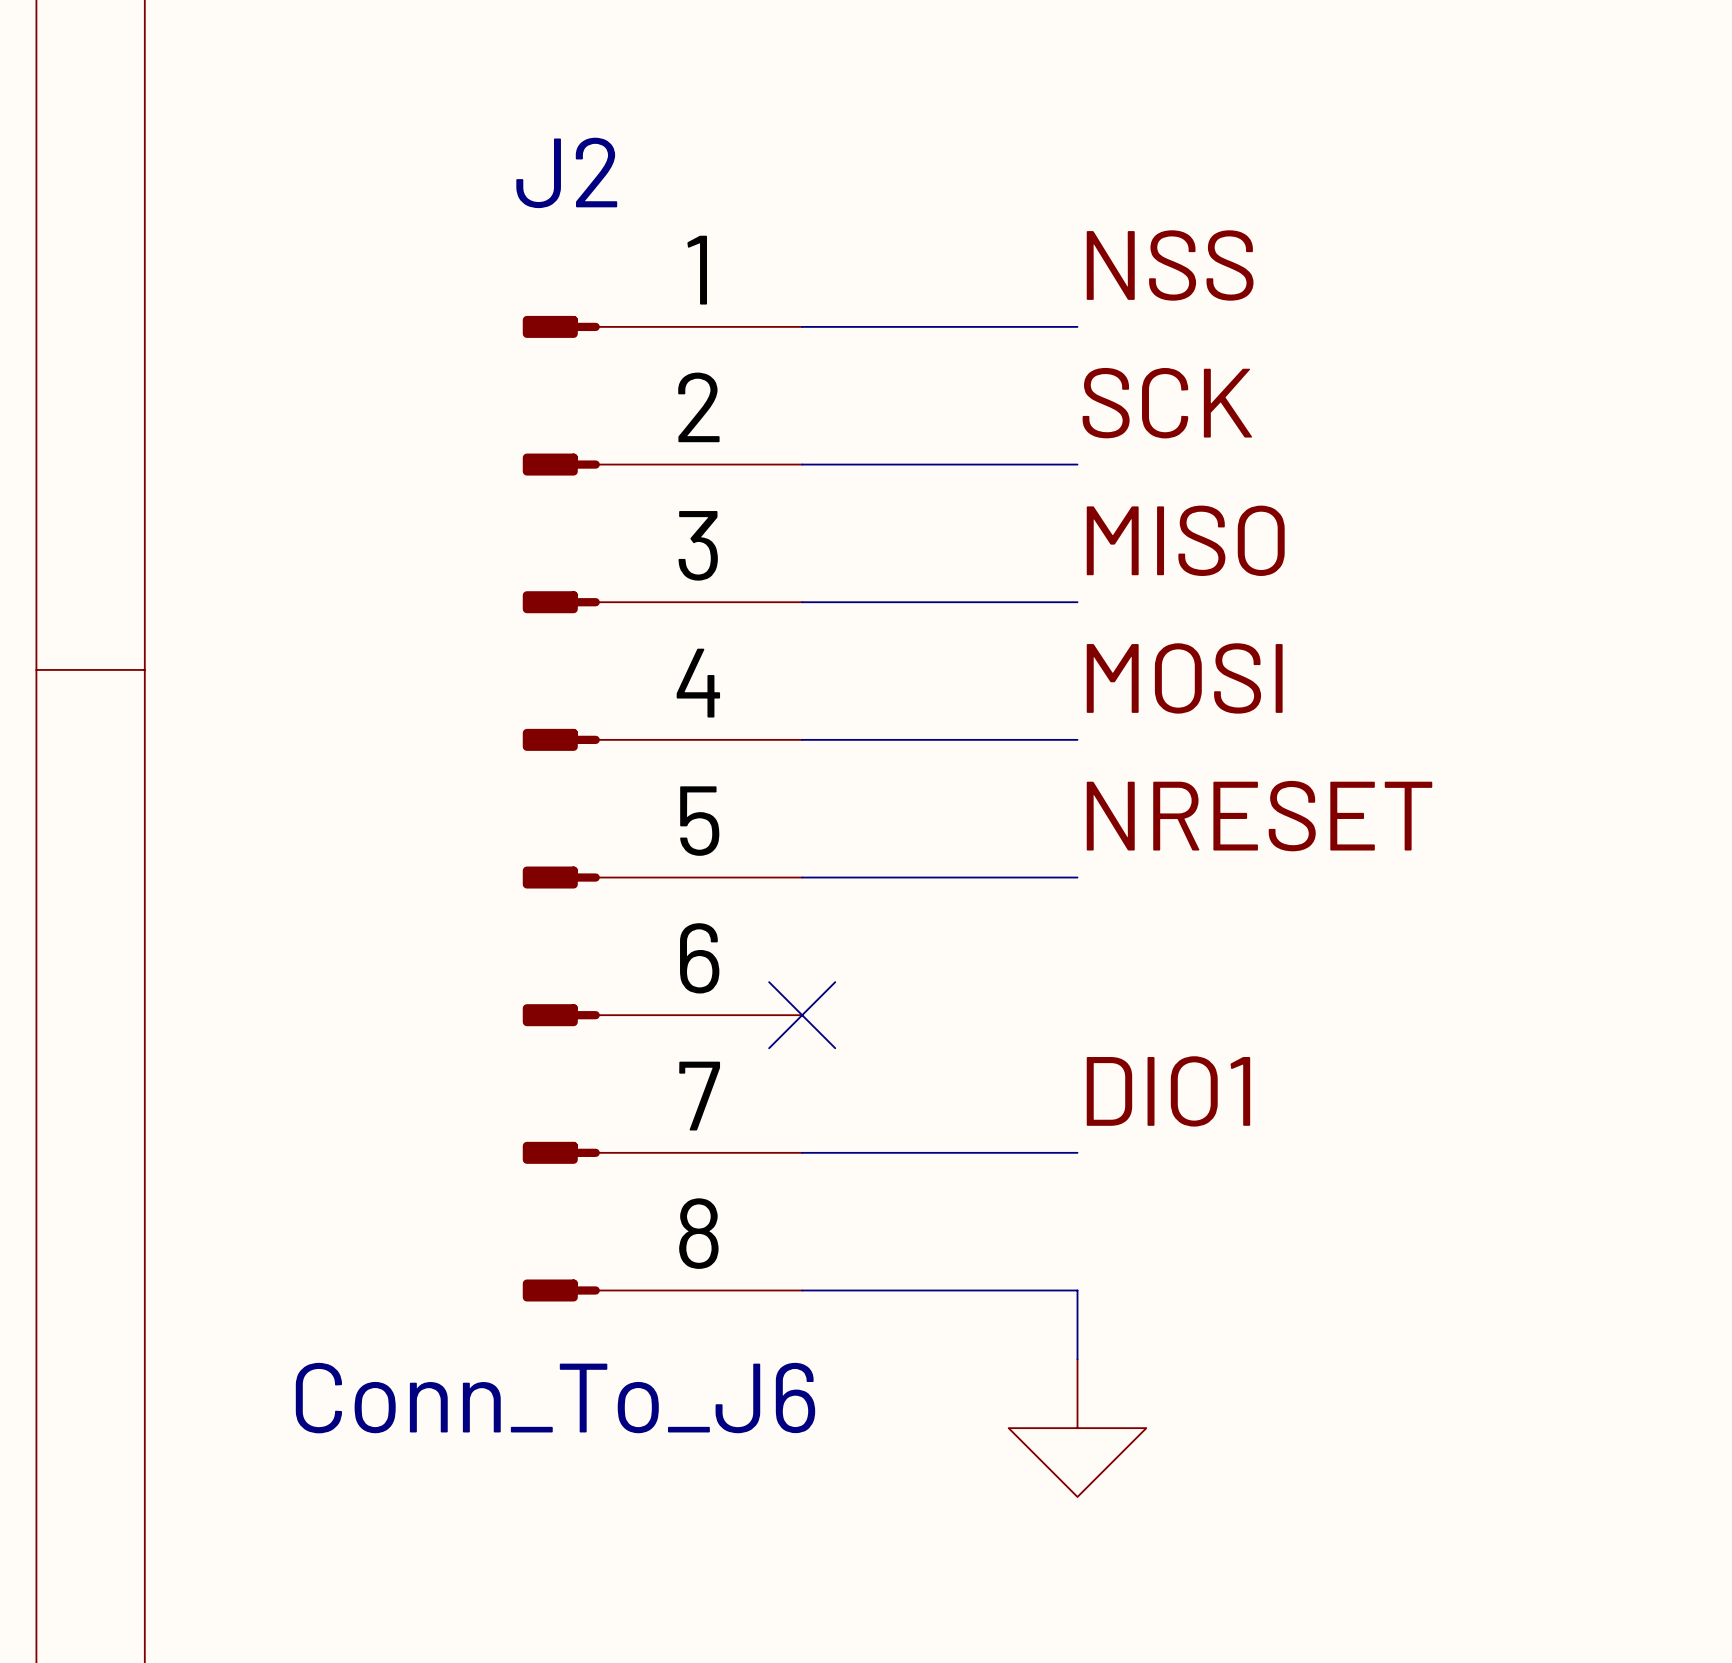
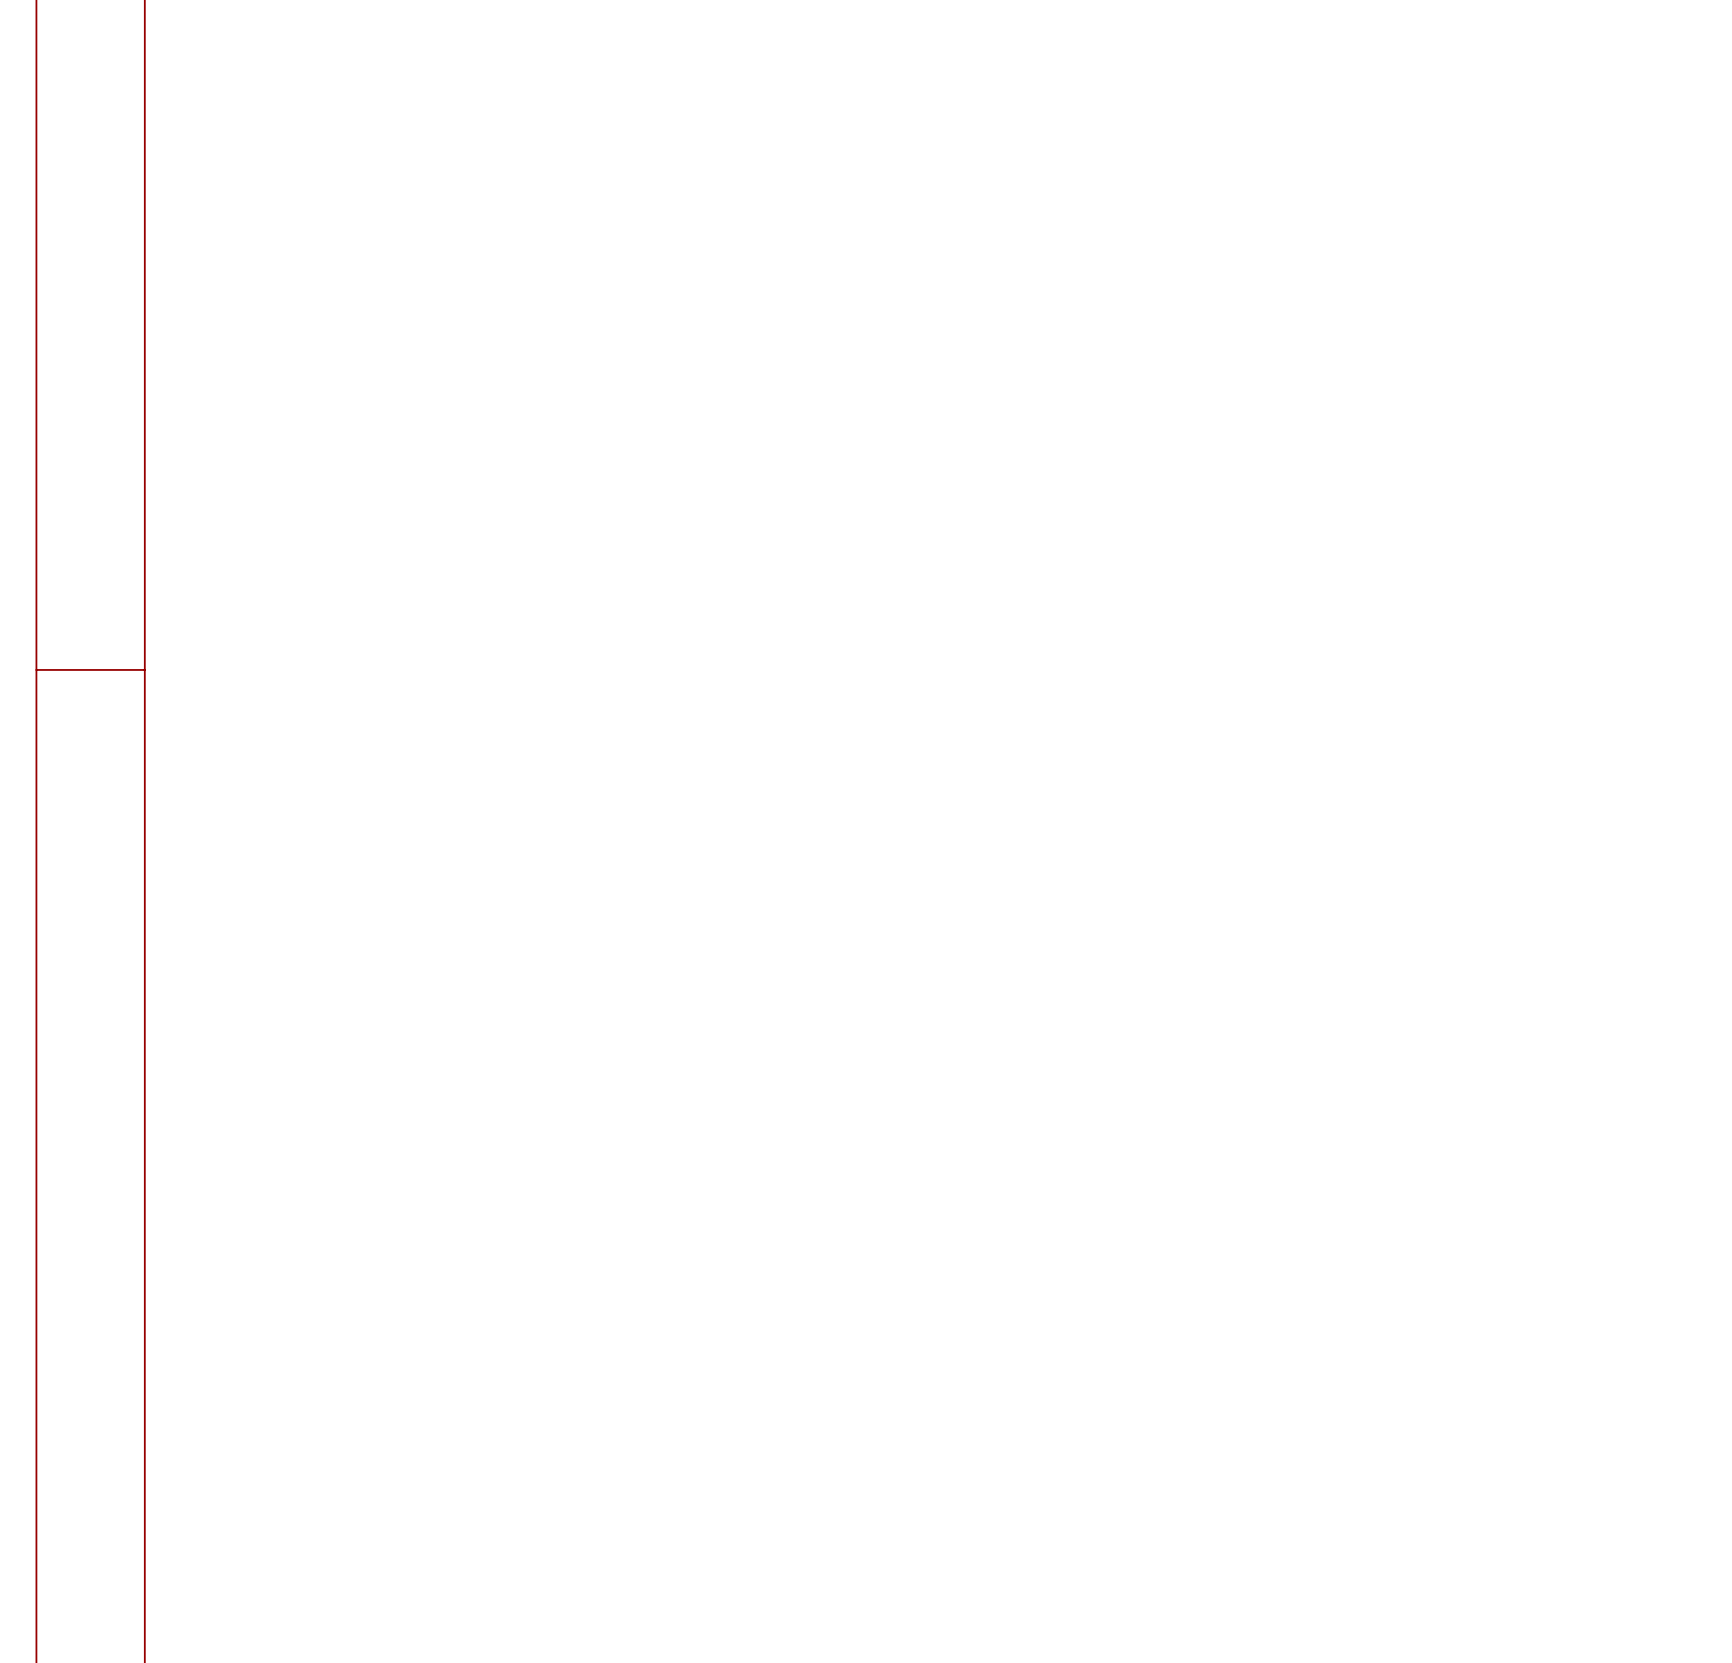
label: NSS (1170, 265) -> none
wire: (802, 326) (1077, 326) -> none
label: SCK (1167, 403) -> none
wire: (802, 464) (1077, 464) -> none
label: MISO (1185, 540) -> none
wire: (802, 602) (1077, 602) -> none
label: MOSI (1184, 678) -> none
wire: (802, 739) (1077, 739) -> none
J2: Conn_To_J6 (662, 808) -> none
label: NRESET (1259, 816) -> none
wire: (802, 877) (1077, 877) -> none
no-connect mark: (802, 1015) -> none
label: DIO1 (1168, 1091) -> none
wire: (802, 1152) (1077, 1152) -> none
wire: (802, 1290) (1077, 1290) (1077, 1359) -> none
power symbol: (1077, 1428) -> none

